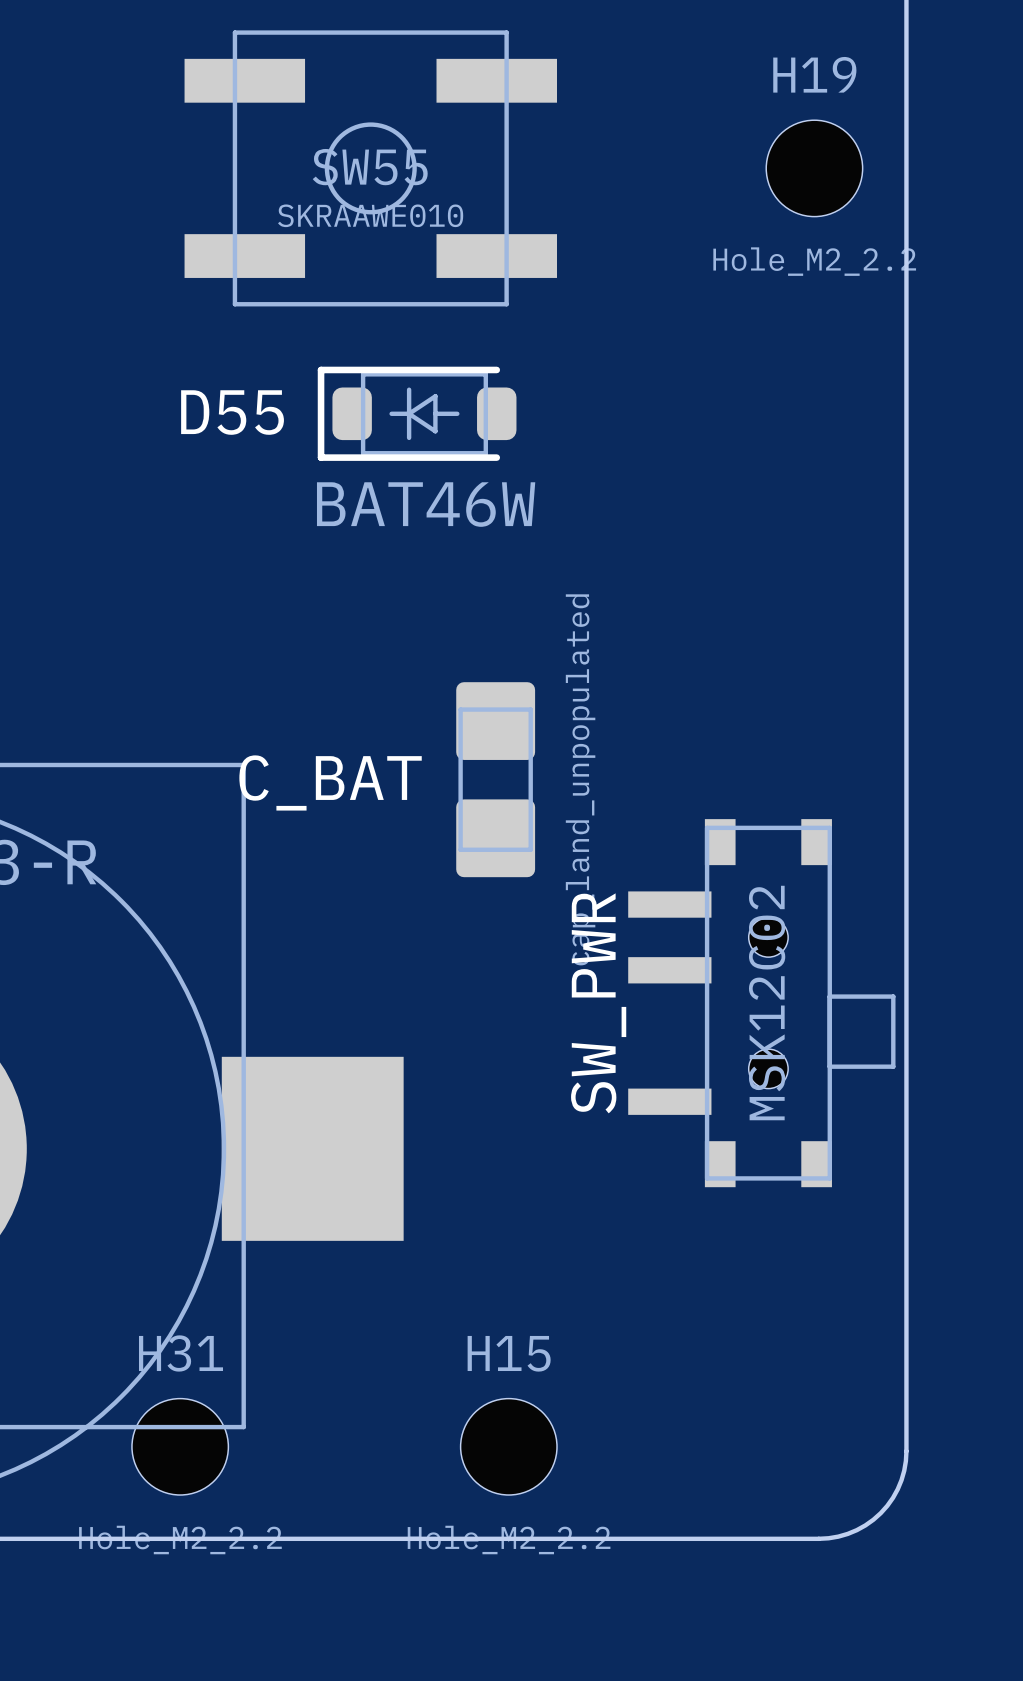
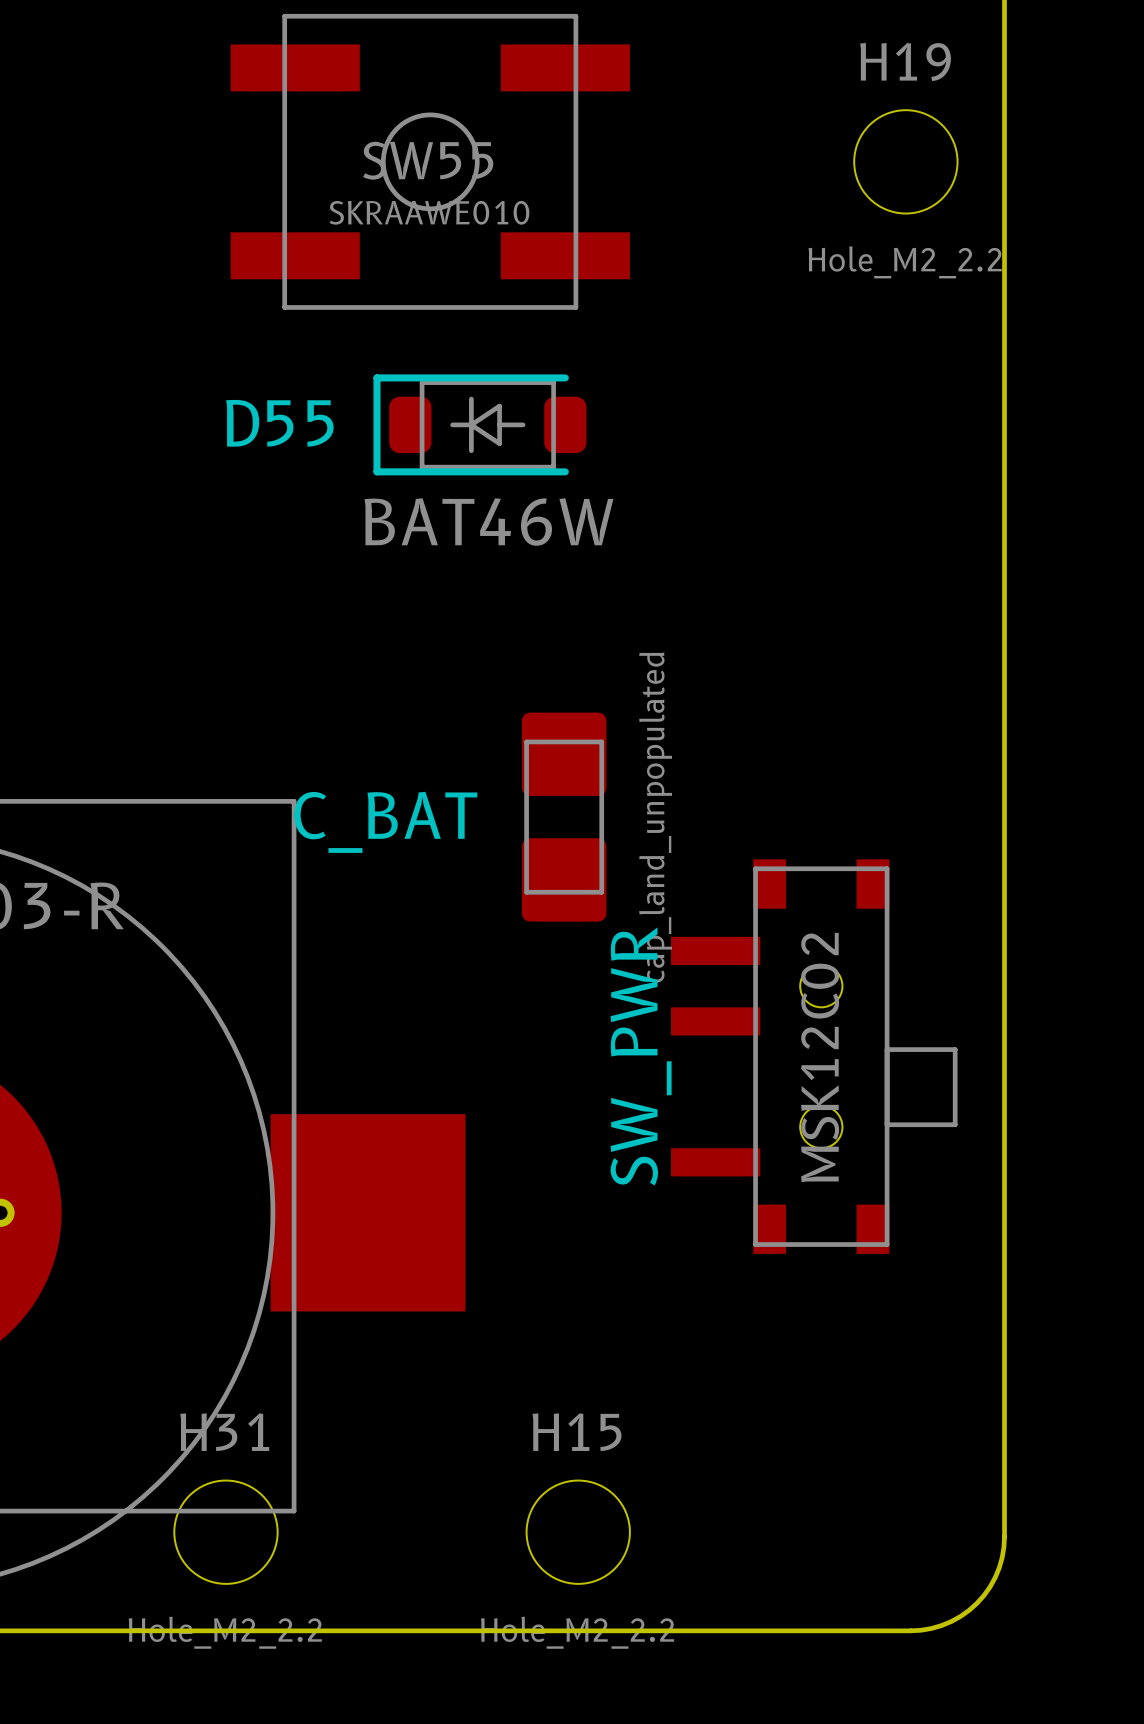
SW_PWR position: (761, 1003) -> (814, 1056)

